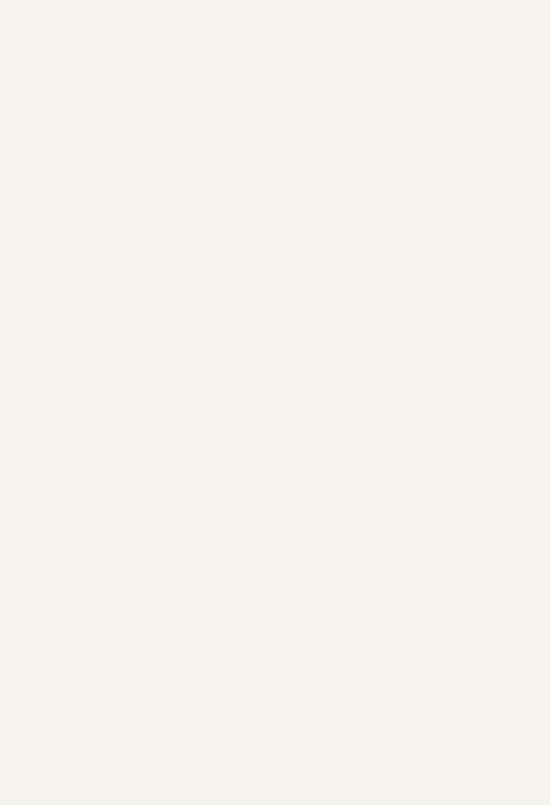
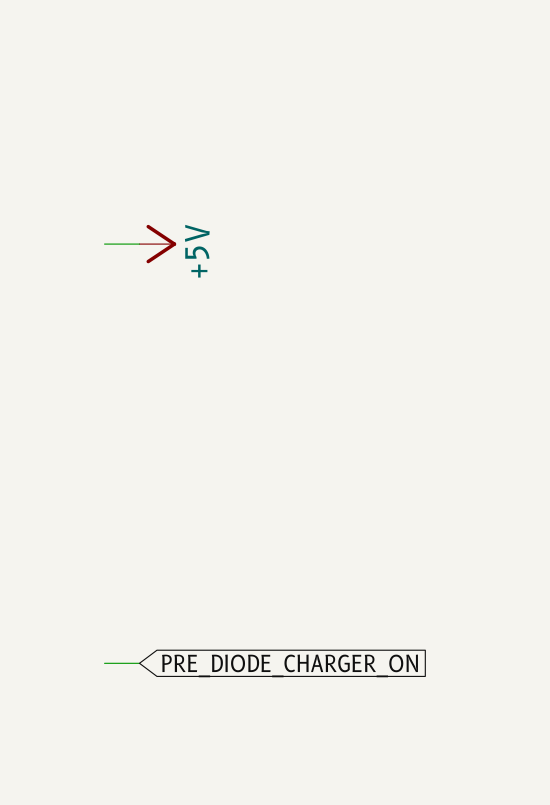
wire: none -> (104, 244) (139, 244)
power symbol: none -> +5V (157, 244)
wire: none -> (104, 663) (139, 663)
global label: none -> PRE_DIODE_CHARGER_ON (290, 665)

